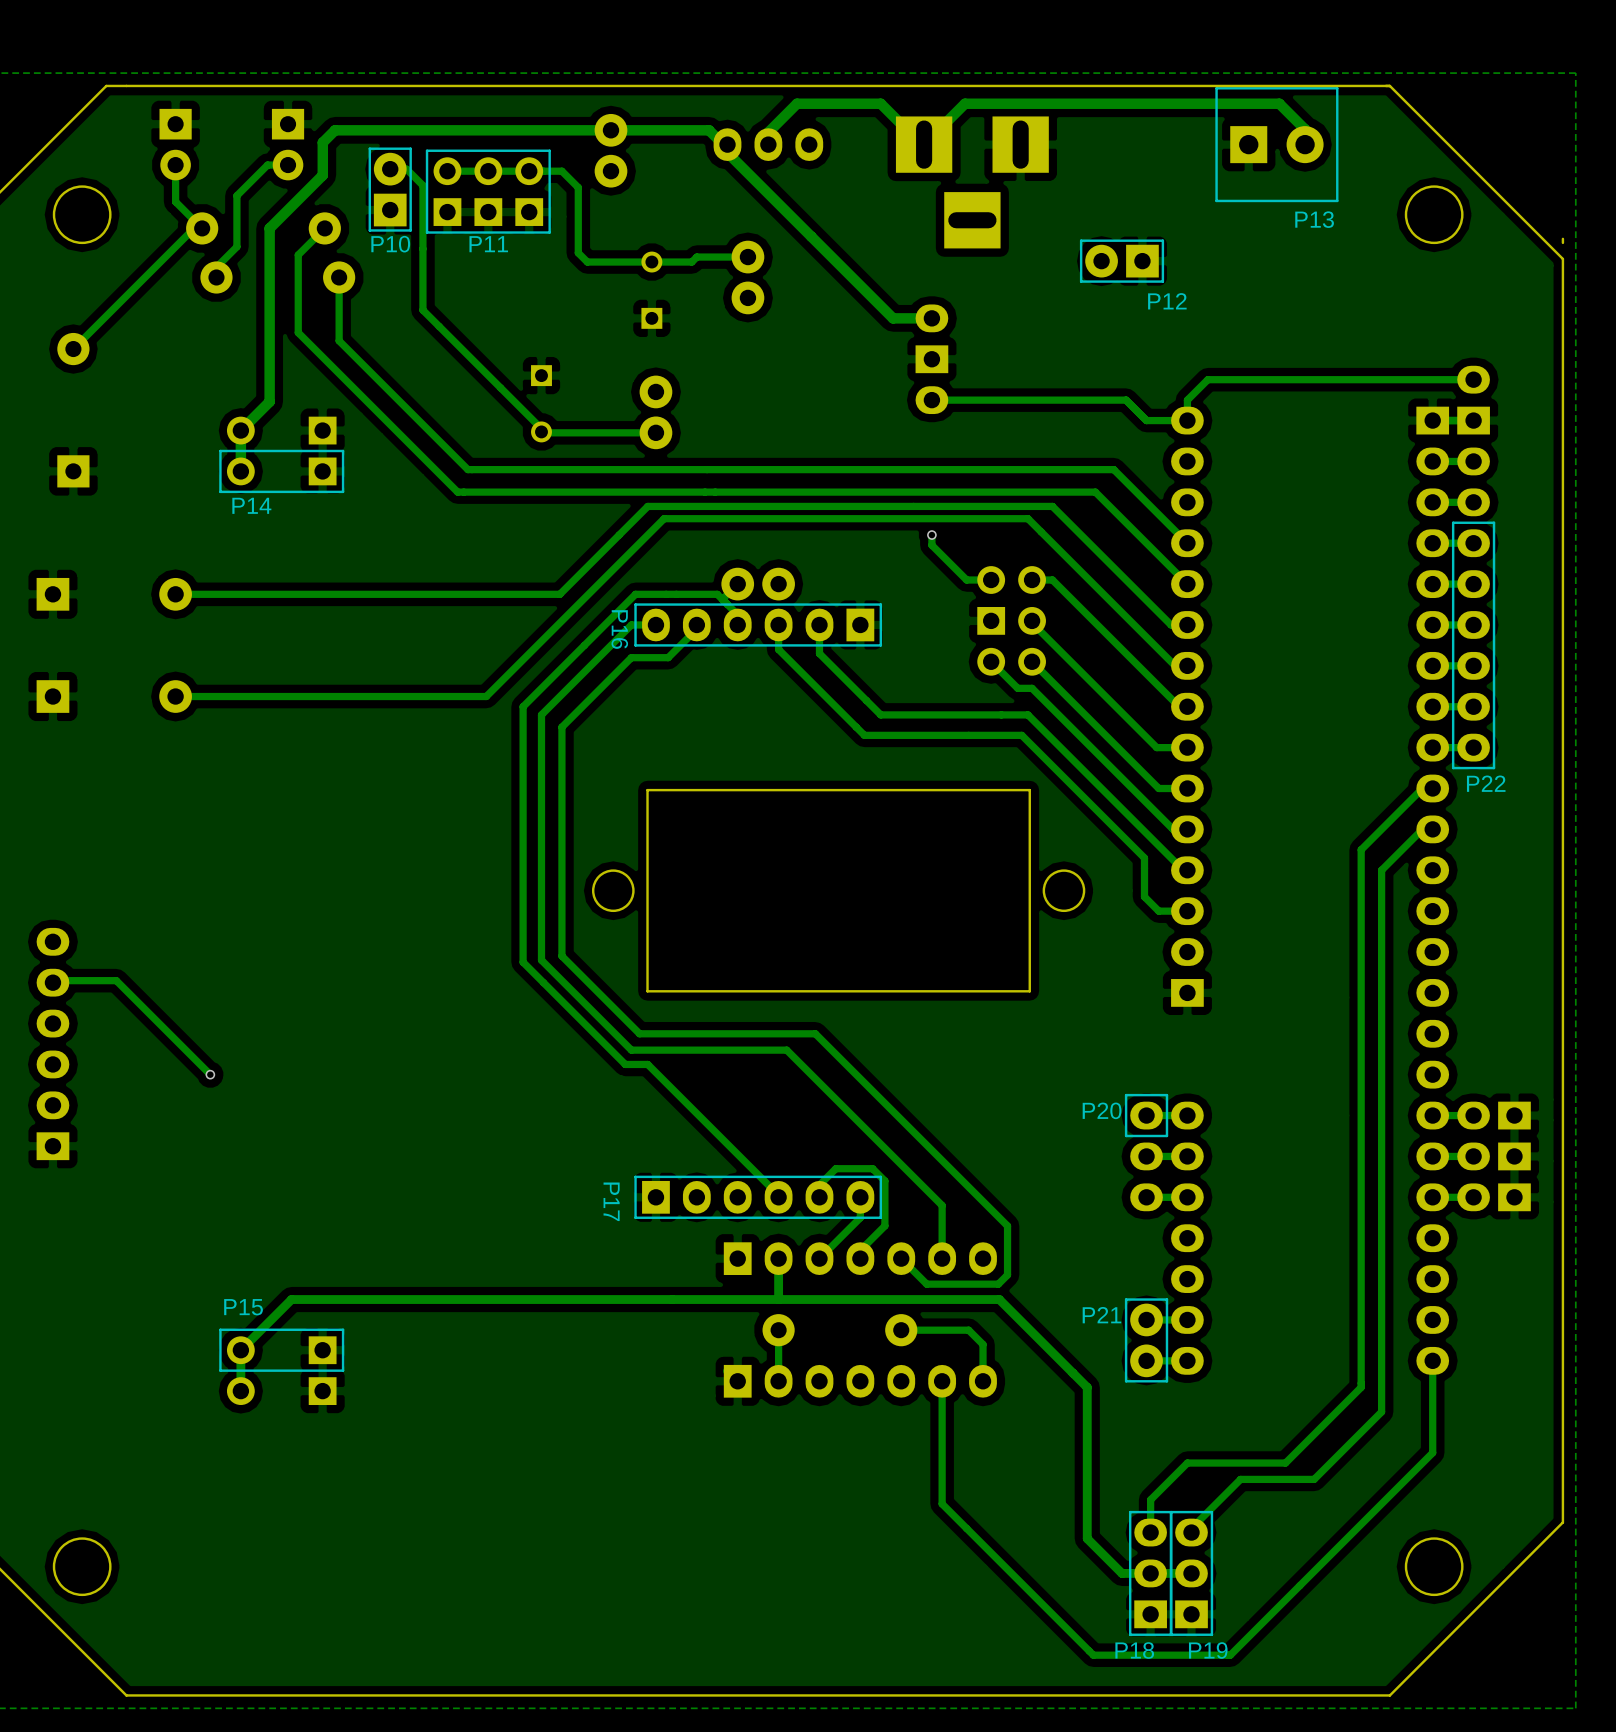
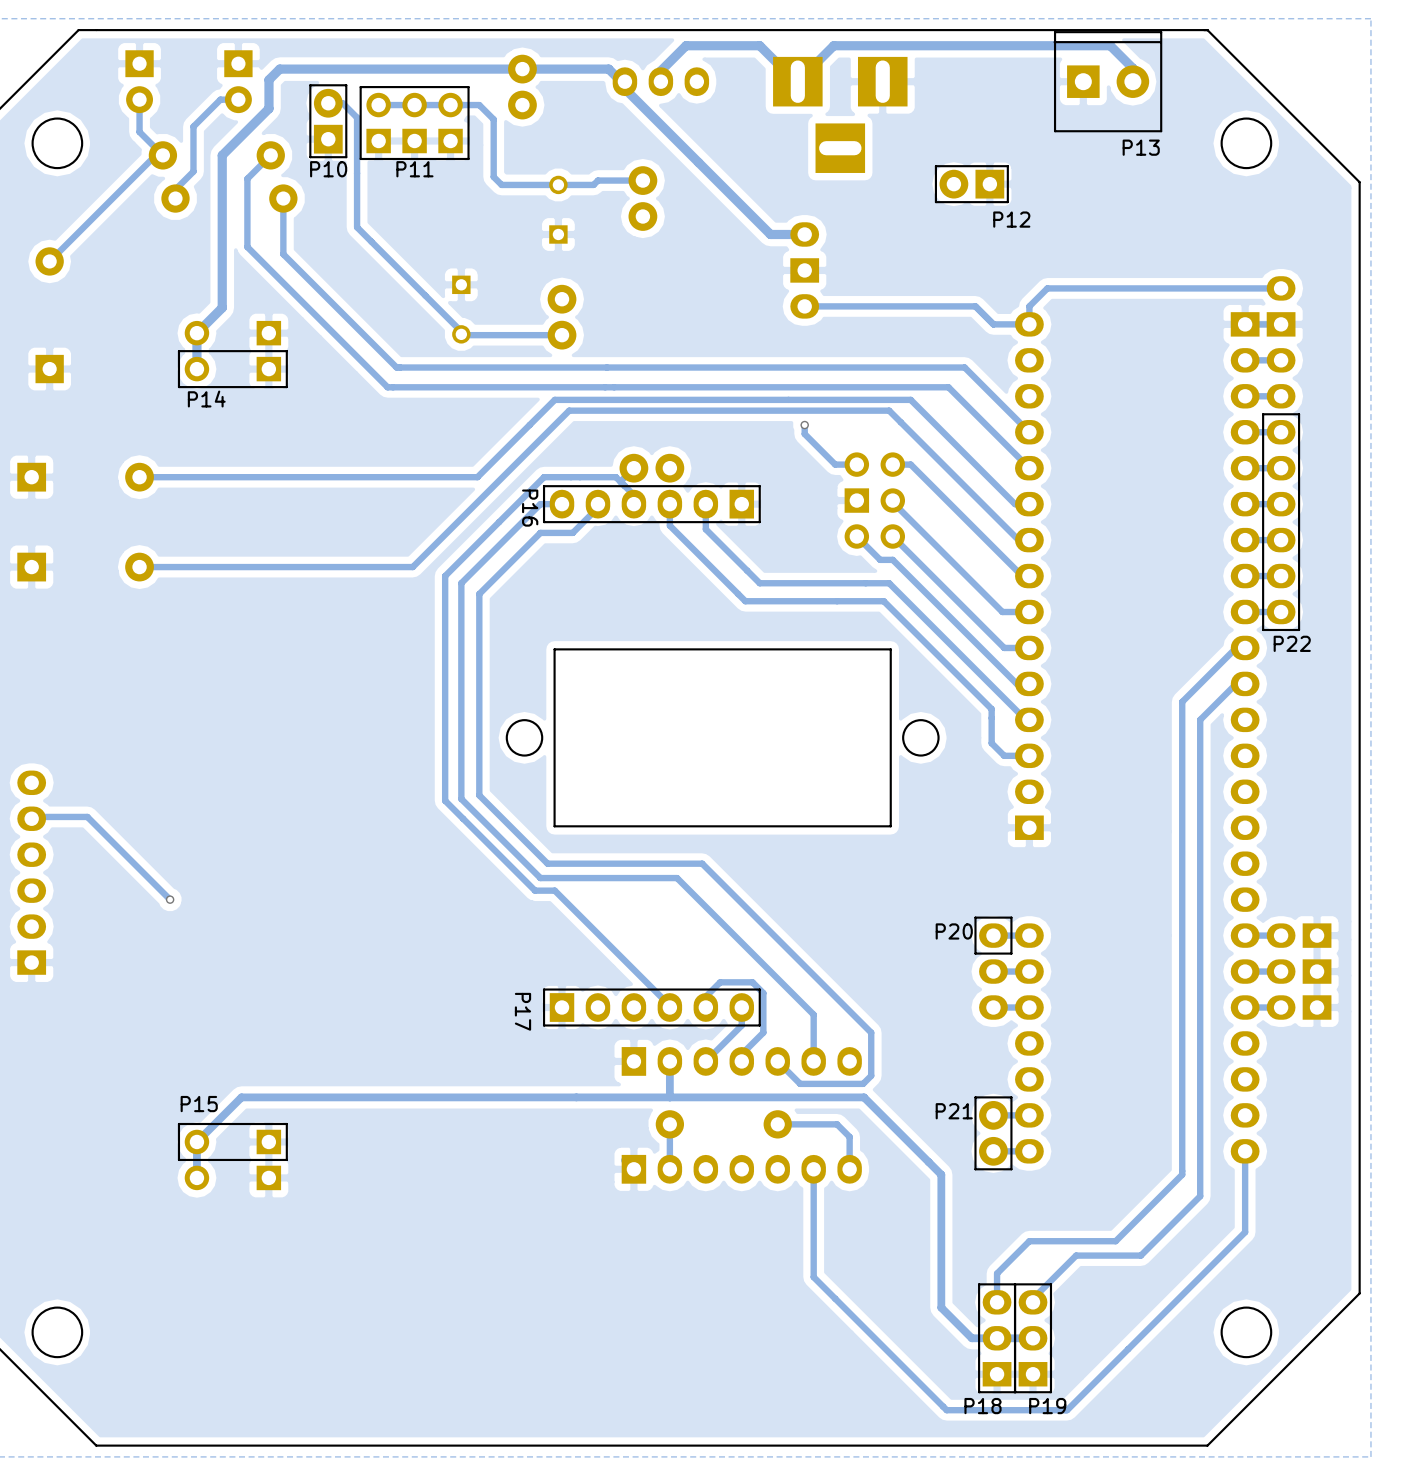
P13 footprint: [1215, 87, 1339, 203] -> [1053, 31, 1163, 133]
board edge: (1562, 238) (1562, 242) -> none

